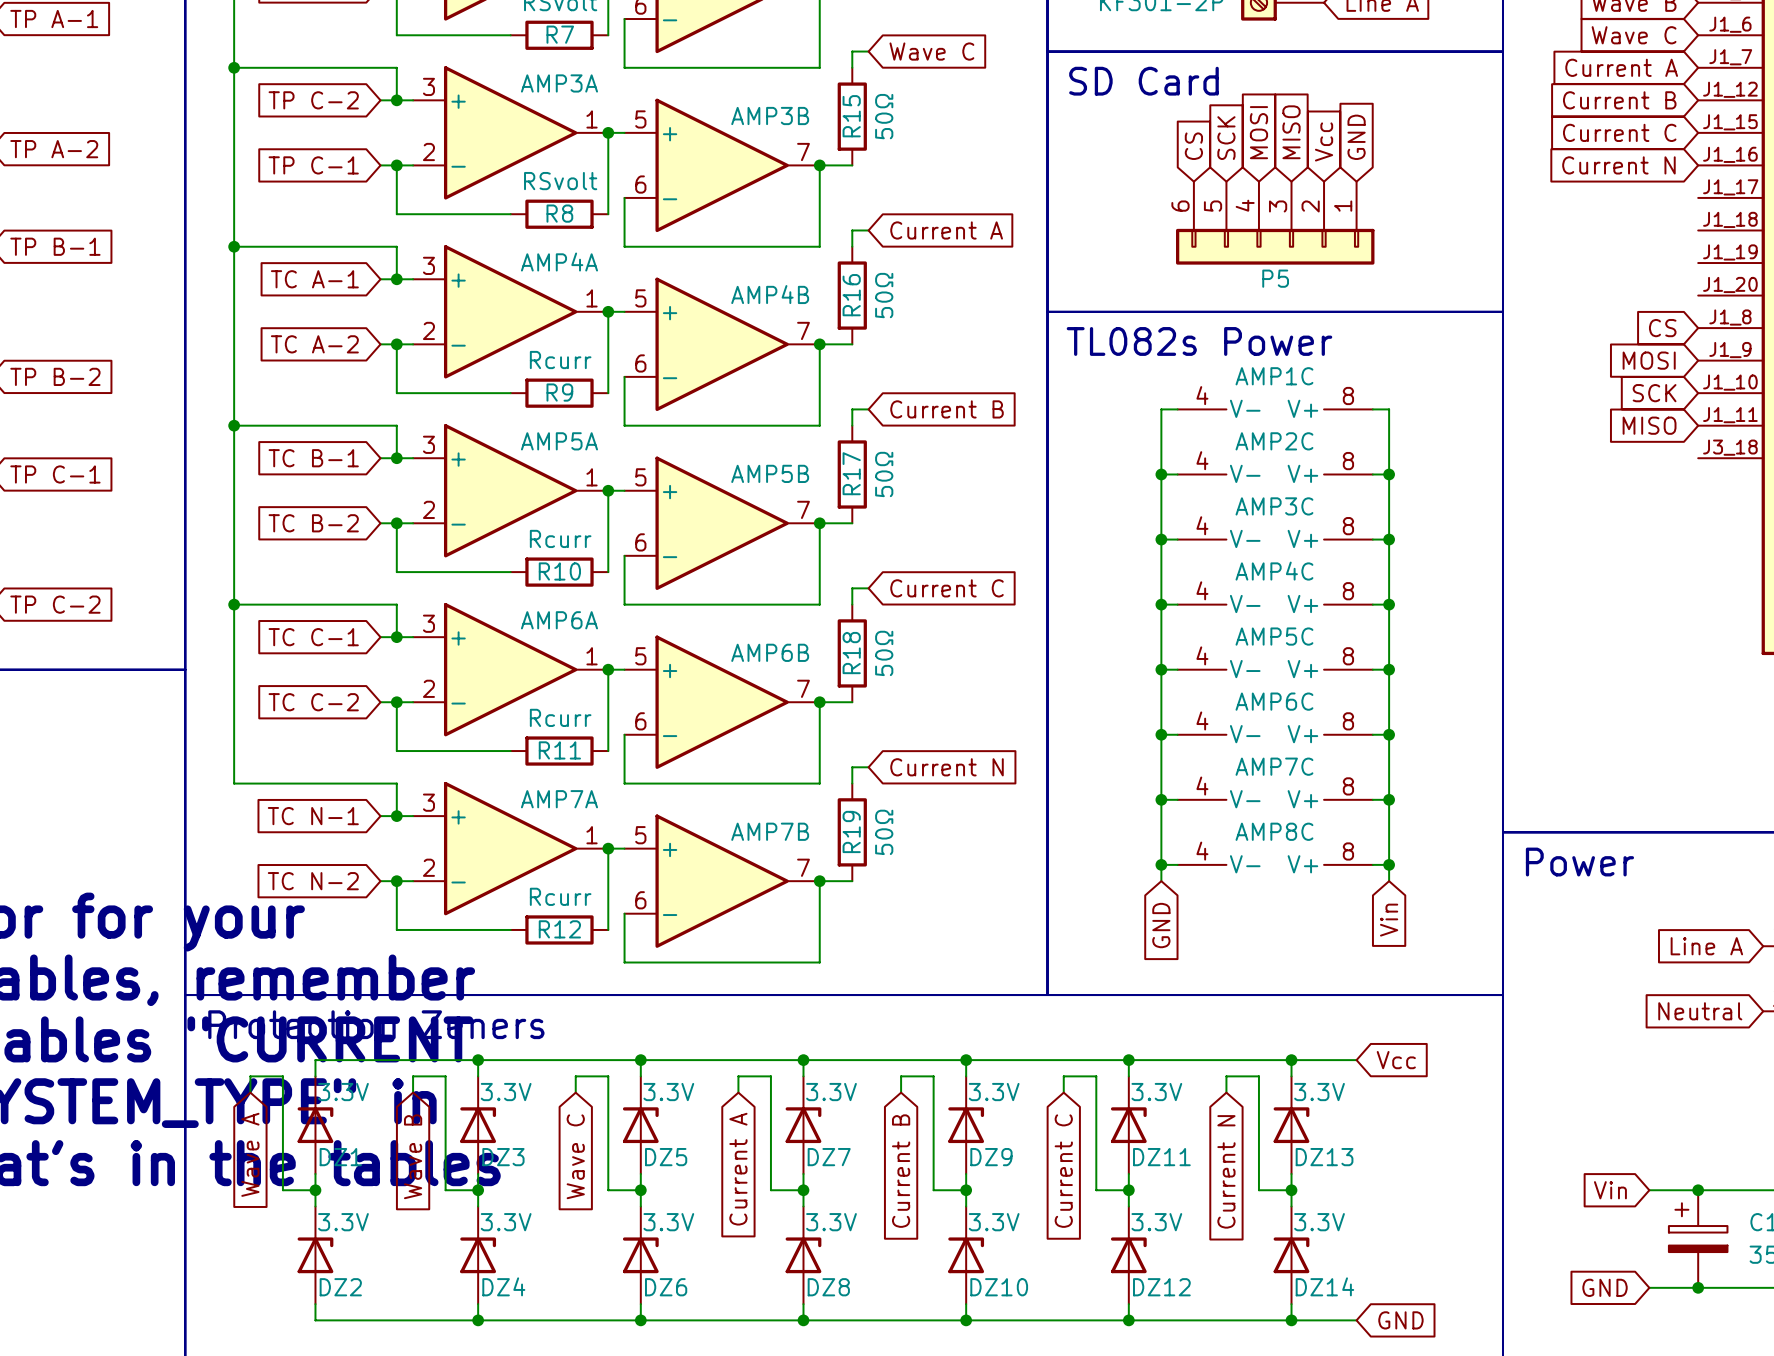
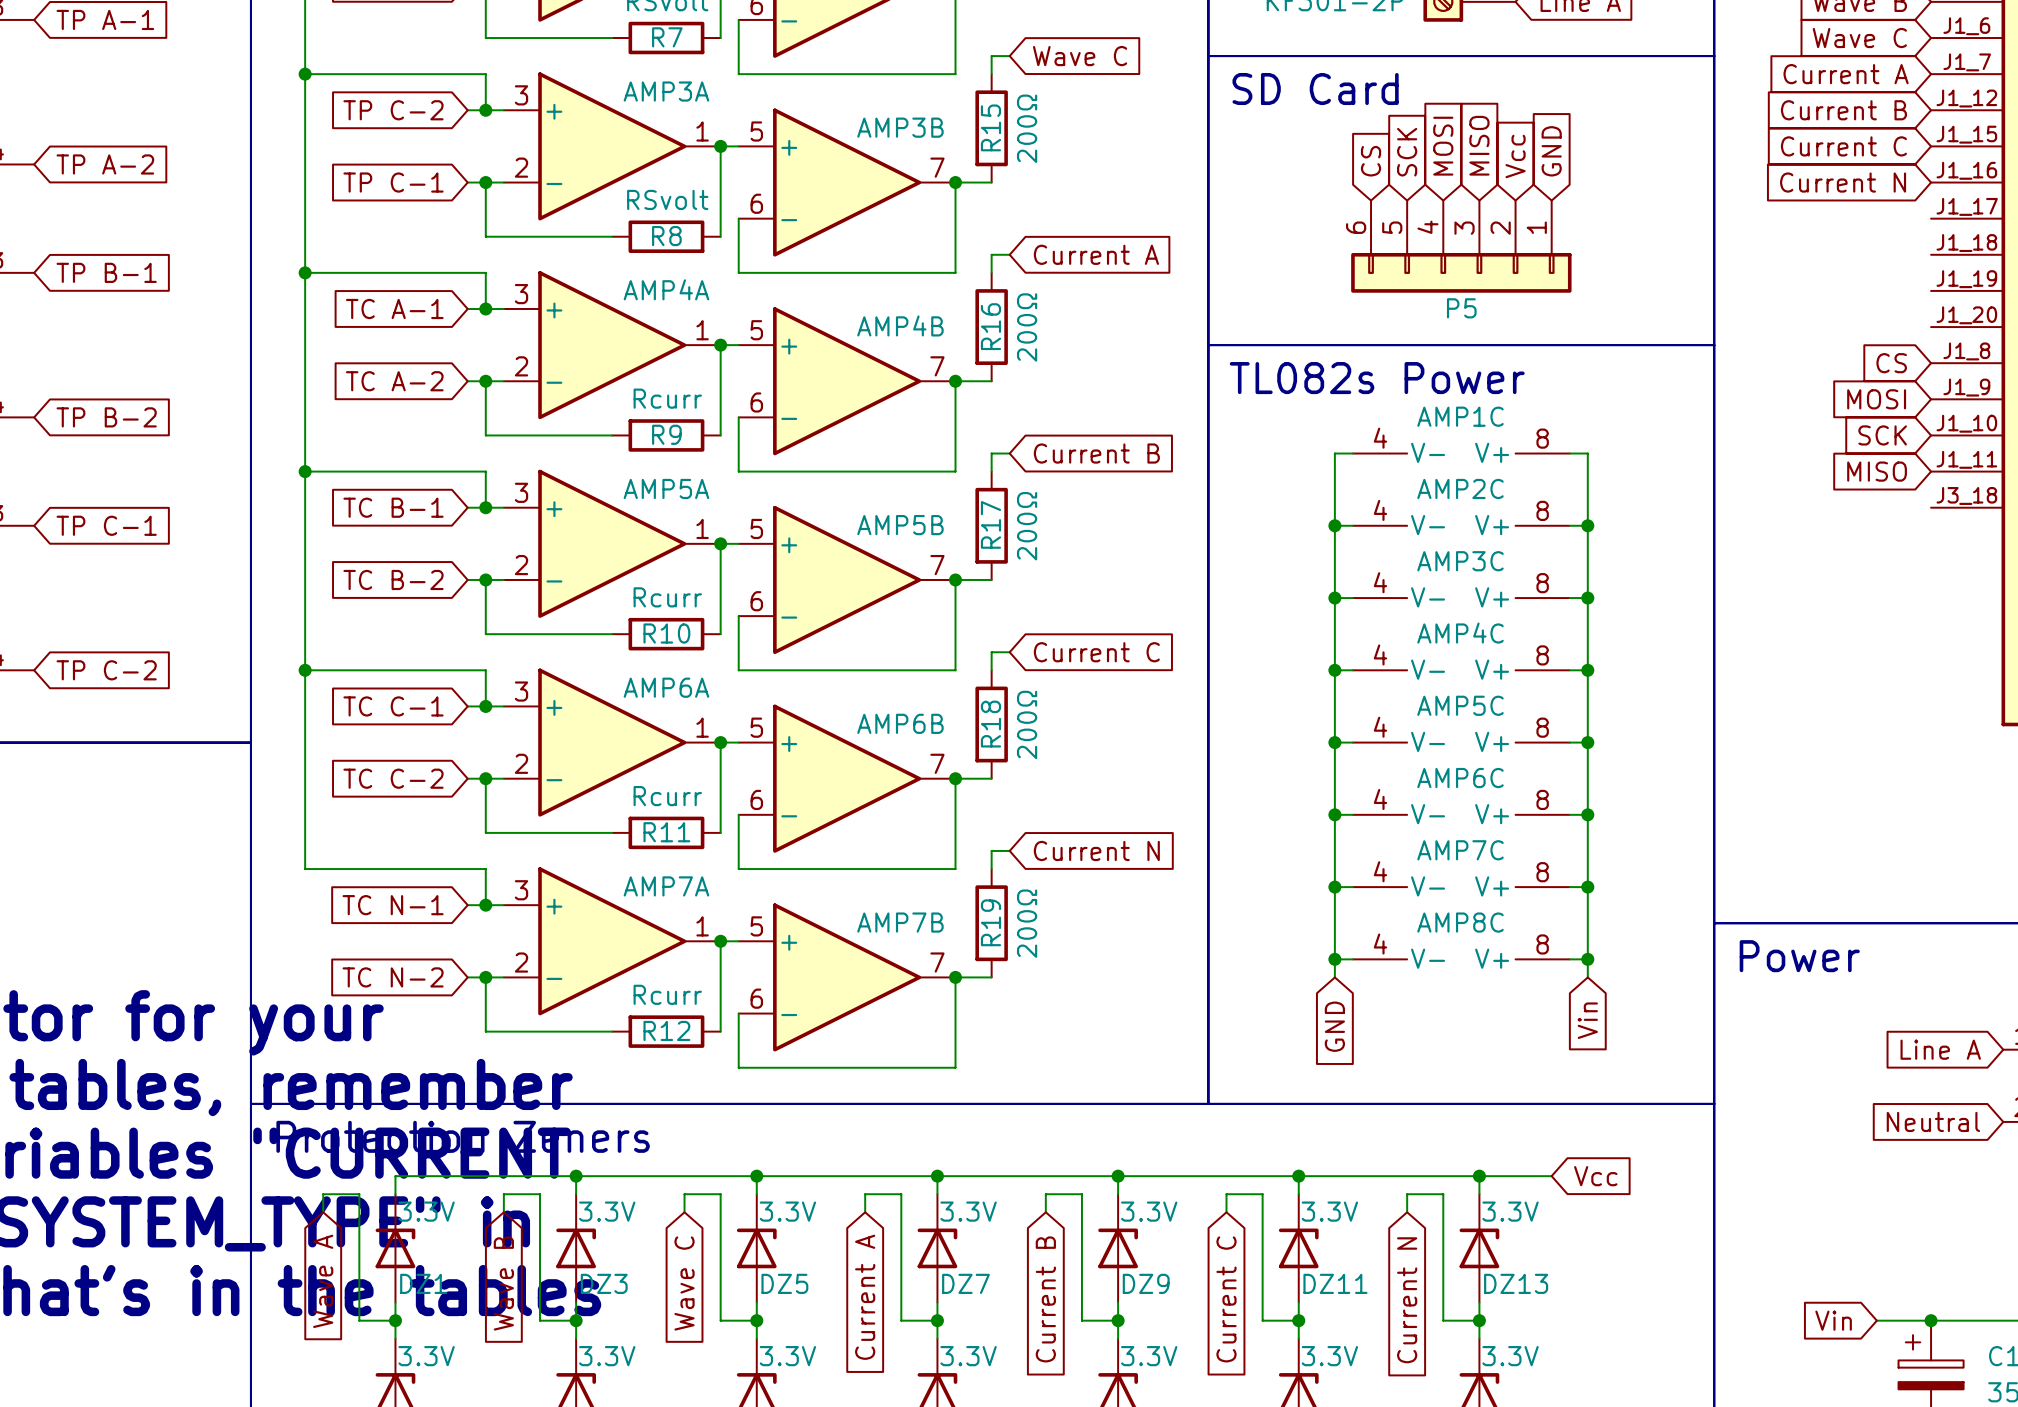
R15 value: 50Ω (884, 116) -> 200Ω (1027, 128)
R16 value: 50Ω (884, 295) -> 200Ω (1027, 327)
R17 value: 50Ω (884, 474) -> 200Ω (1027, 526)
R18 value: 50Ω (884, 653) -> 200Ω (1027, 724)
R19 value: 50Ω (884, 832) -> 200Ω (1027, 923)

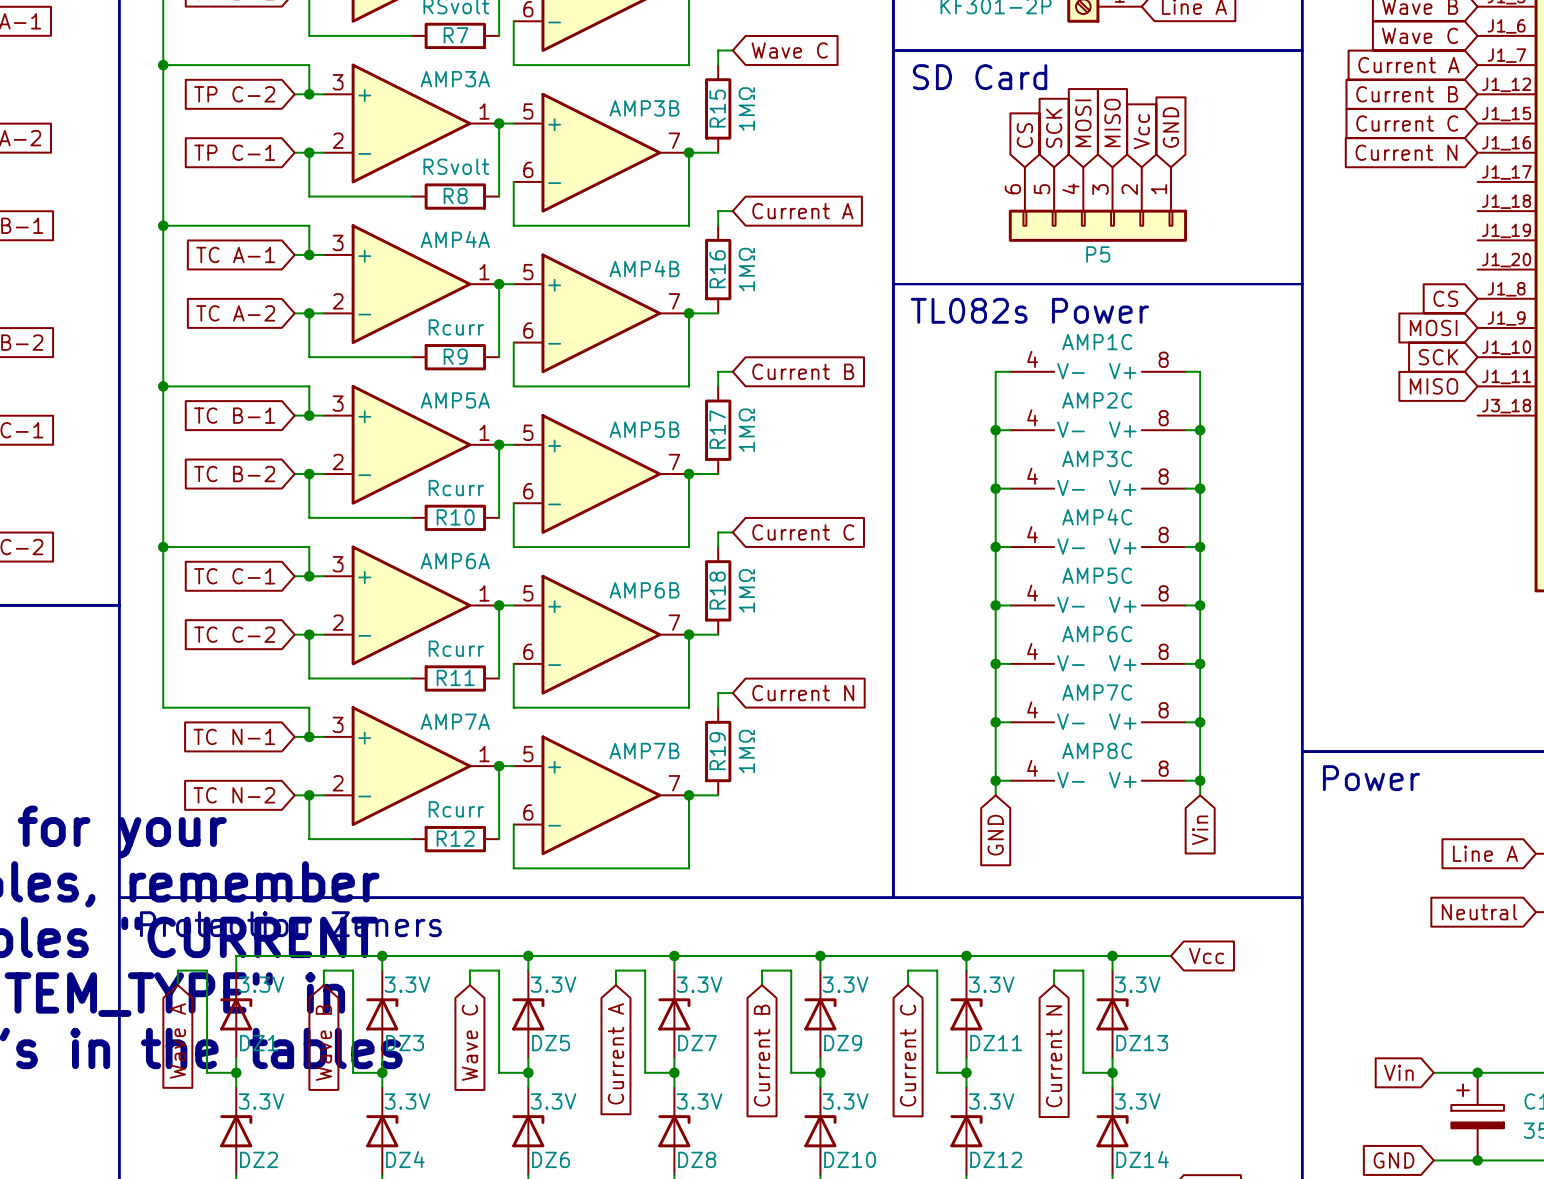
R15 value: 200Ω (1027, 128) -> 1MΩ (746, 108)
R16 value: 200Ω (1027, 327) -> 1MΩ (746, 269)
R17 value: 200Ω (1027, 526) -> 1MΩ (746, 430)
R18 value: 200Ω (1027, 724) -> 1MΩ (746, 590)
R19 value: 200Ω (1027, 923) -> 1MΩ (746, 751)

